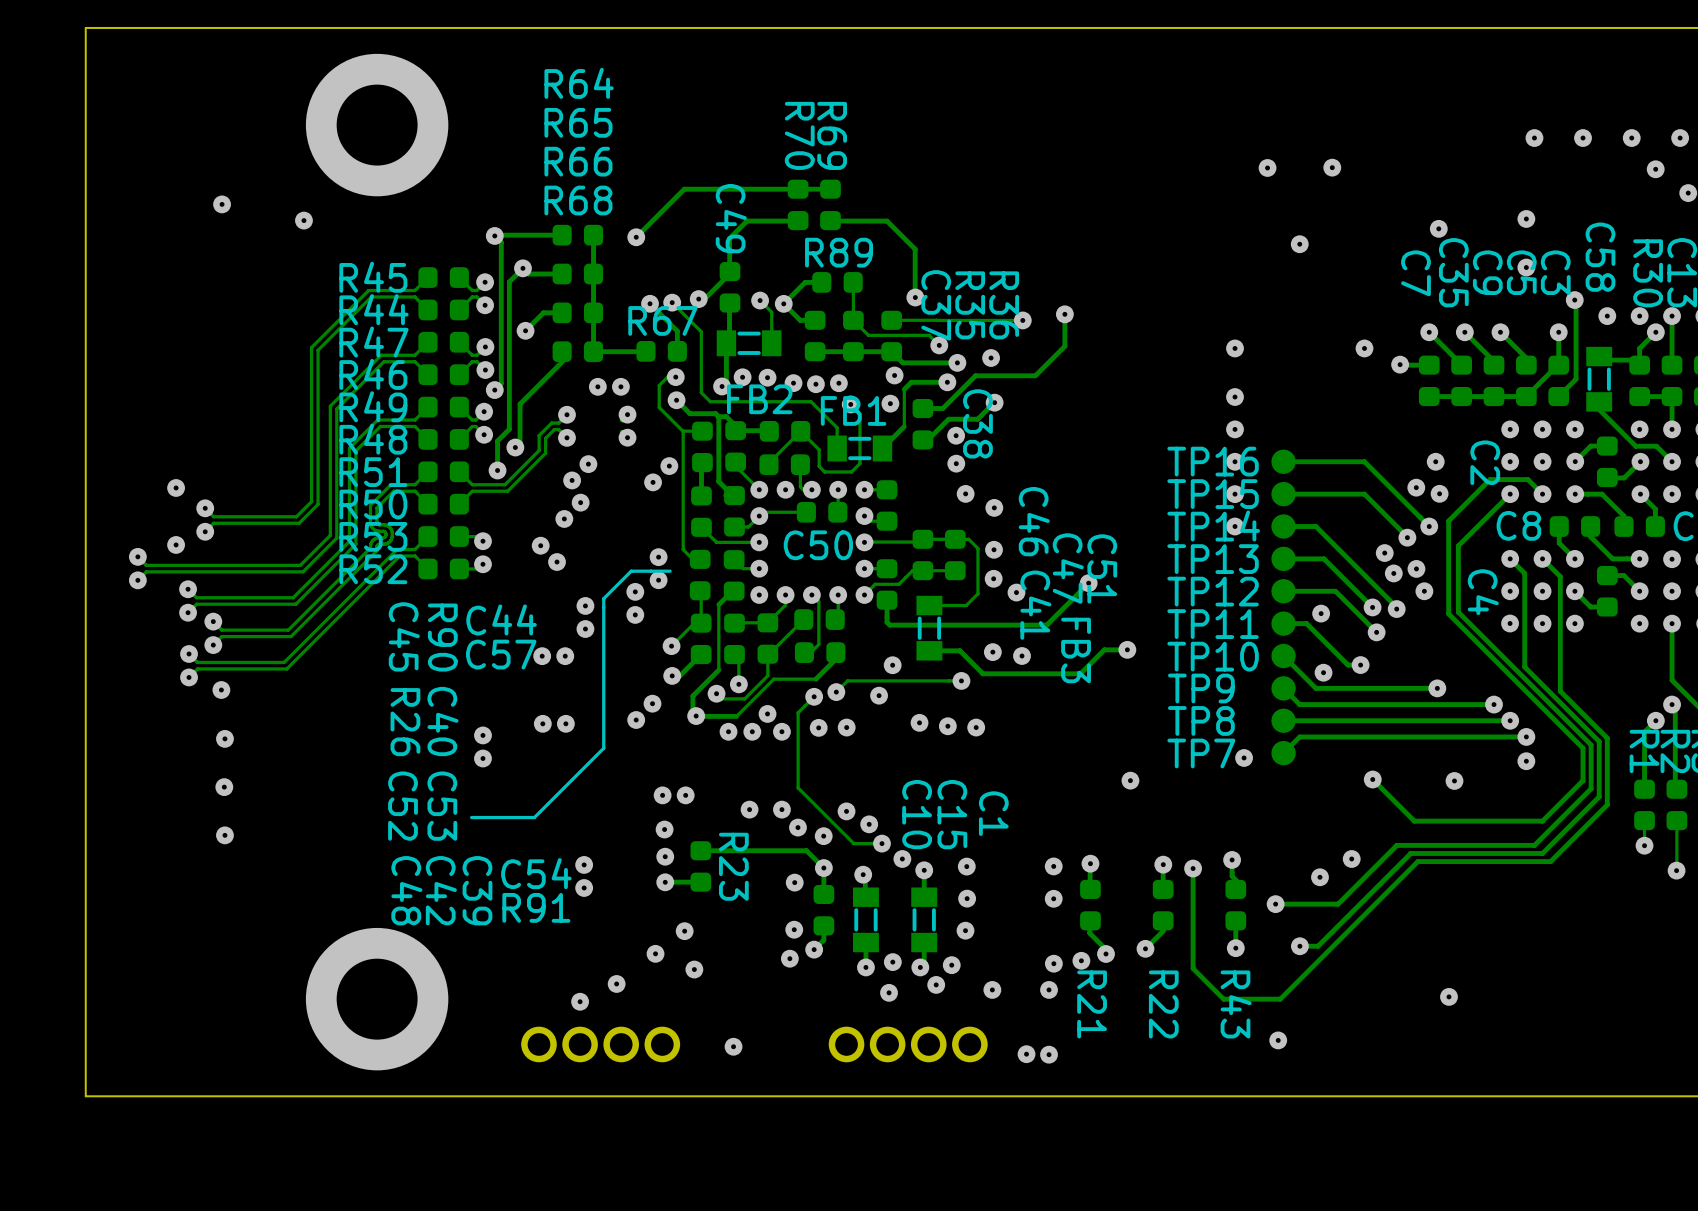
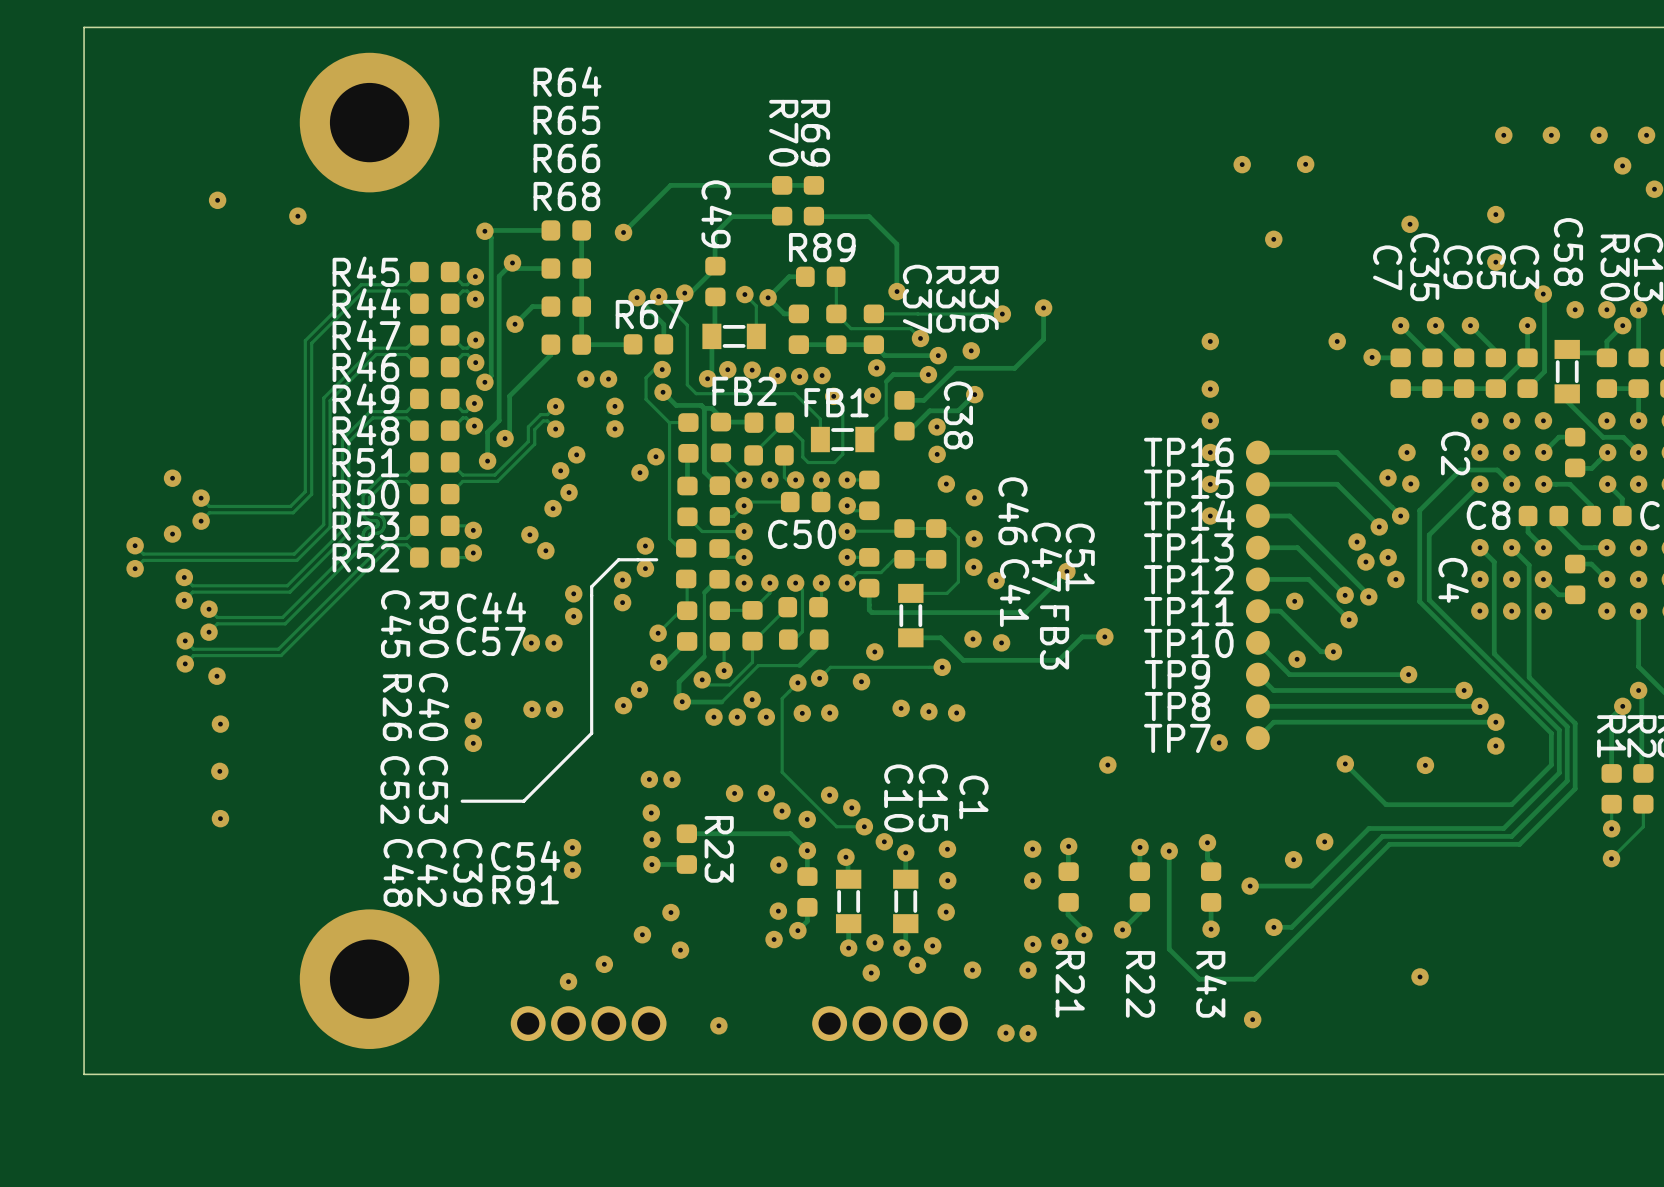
track: (1676, 843) (1676, 870) -> (1643, 826) (1611, 858)
via: (1676, 870) -> none
via: none -> (1611, 858)

